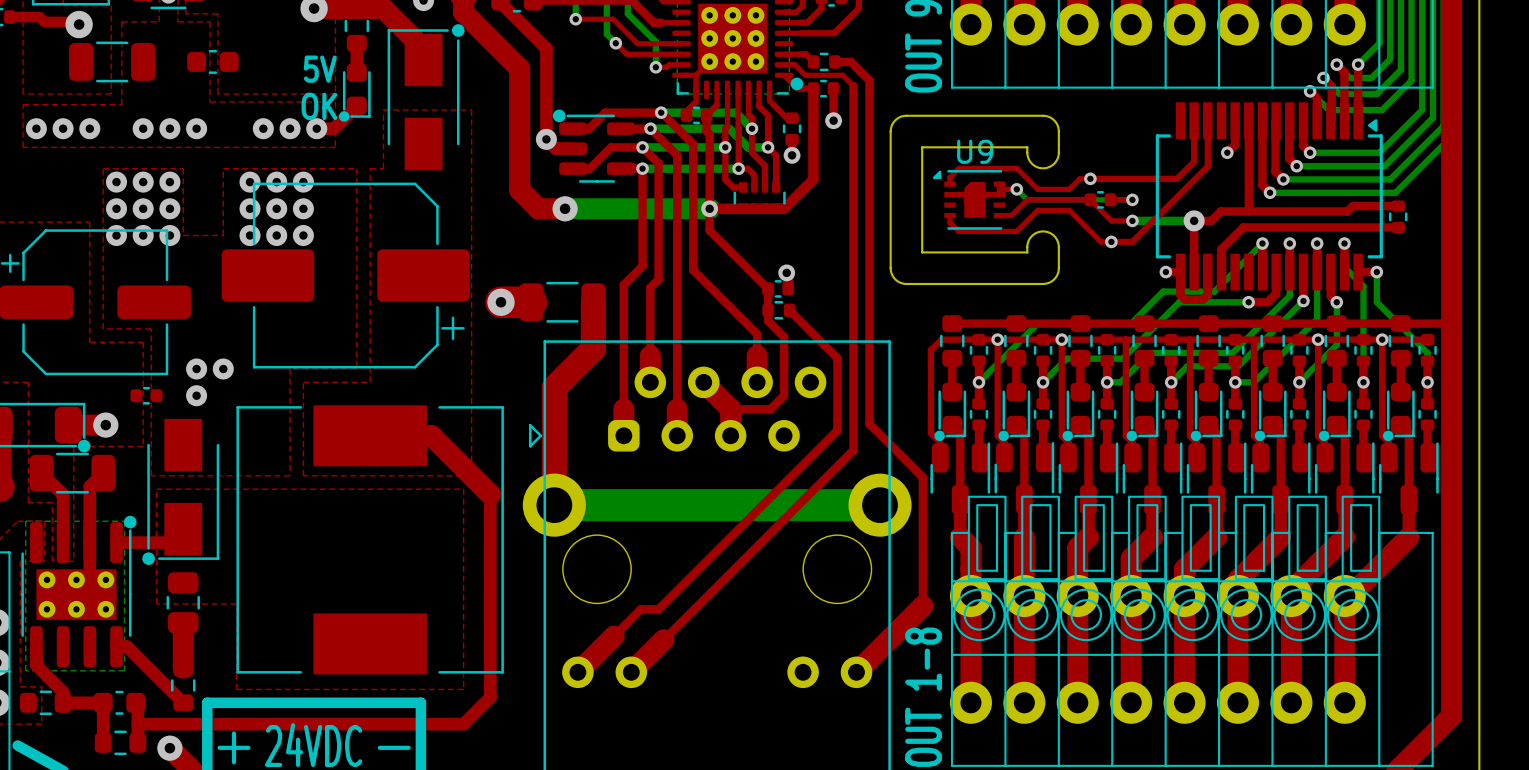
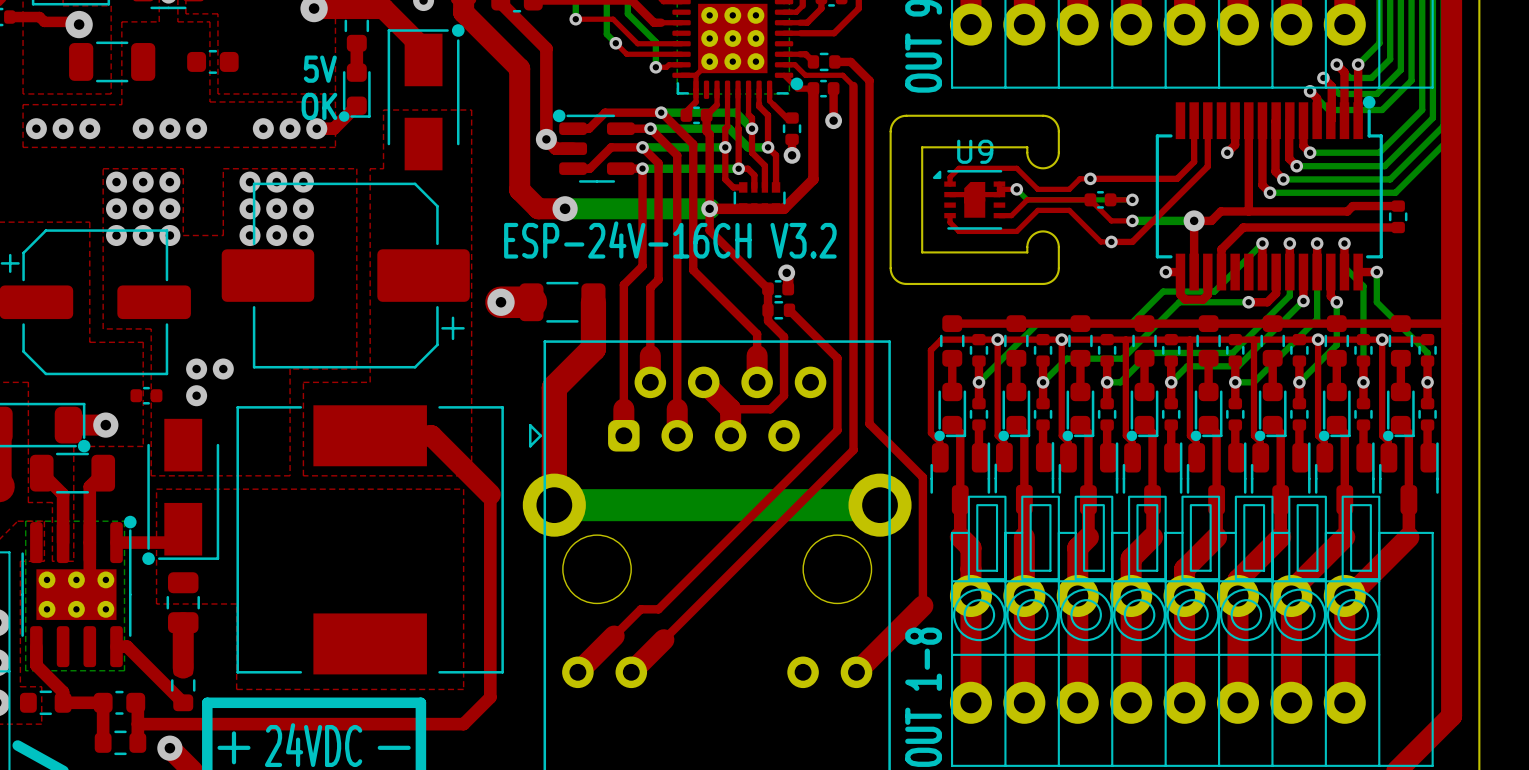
part footprint: [1155, 102, 1383, 291] -> [1155, 95, 1383, 291]
text: none -> ESP-24V-16CH V3.2 (670, 239)

